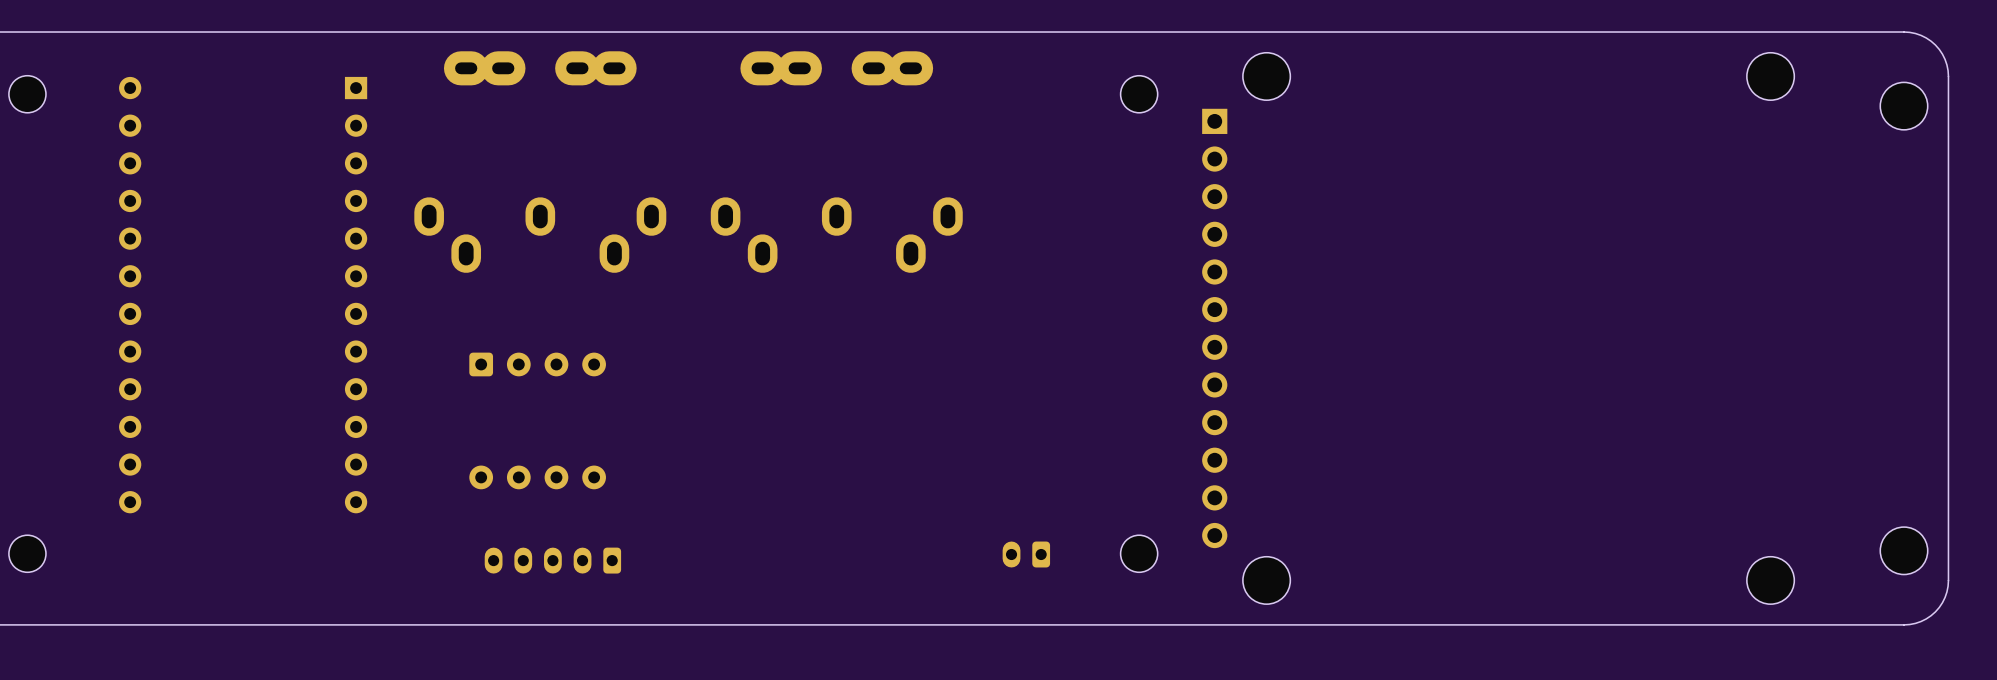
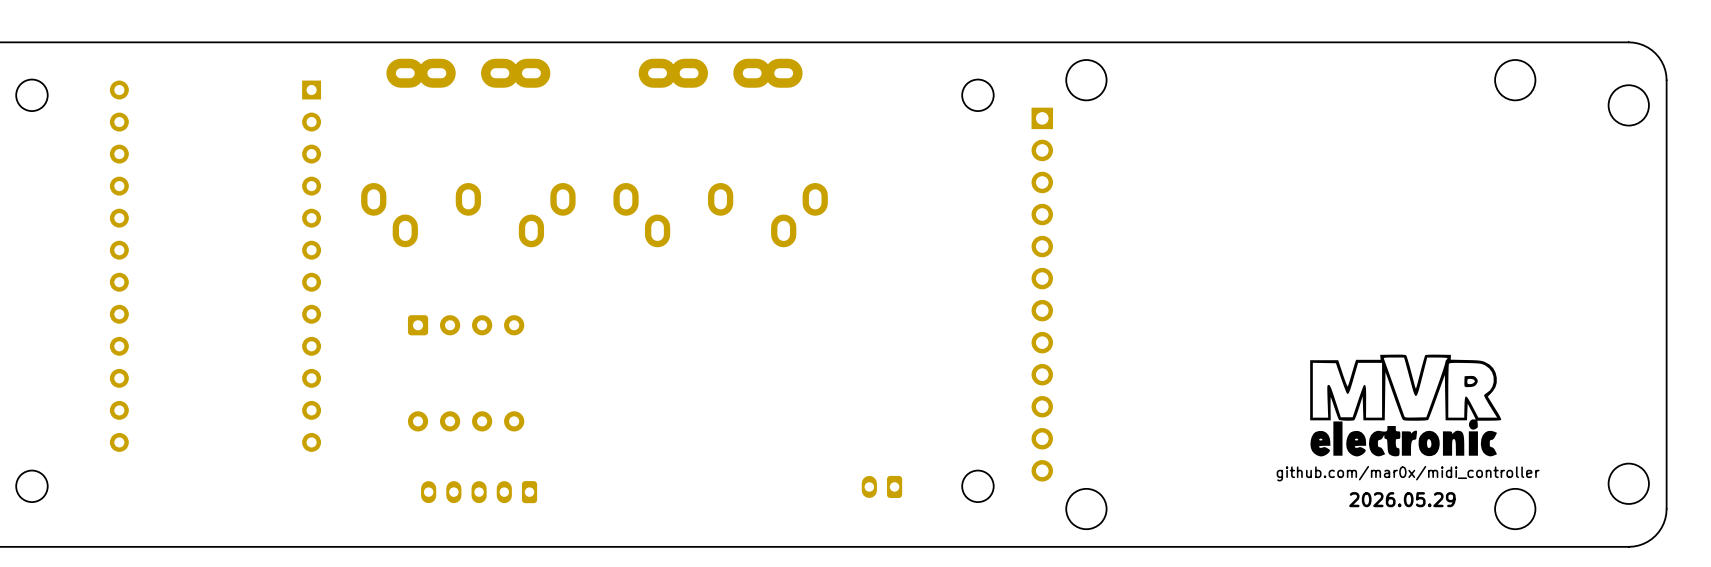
drawing: none -> [1310, 354, 1502, 457]
text: none -> github.com/mar0x/midi_controller (1408, 473)
text: none -> 2026.05.29 (1402, 499)

